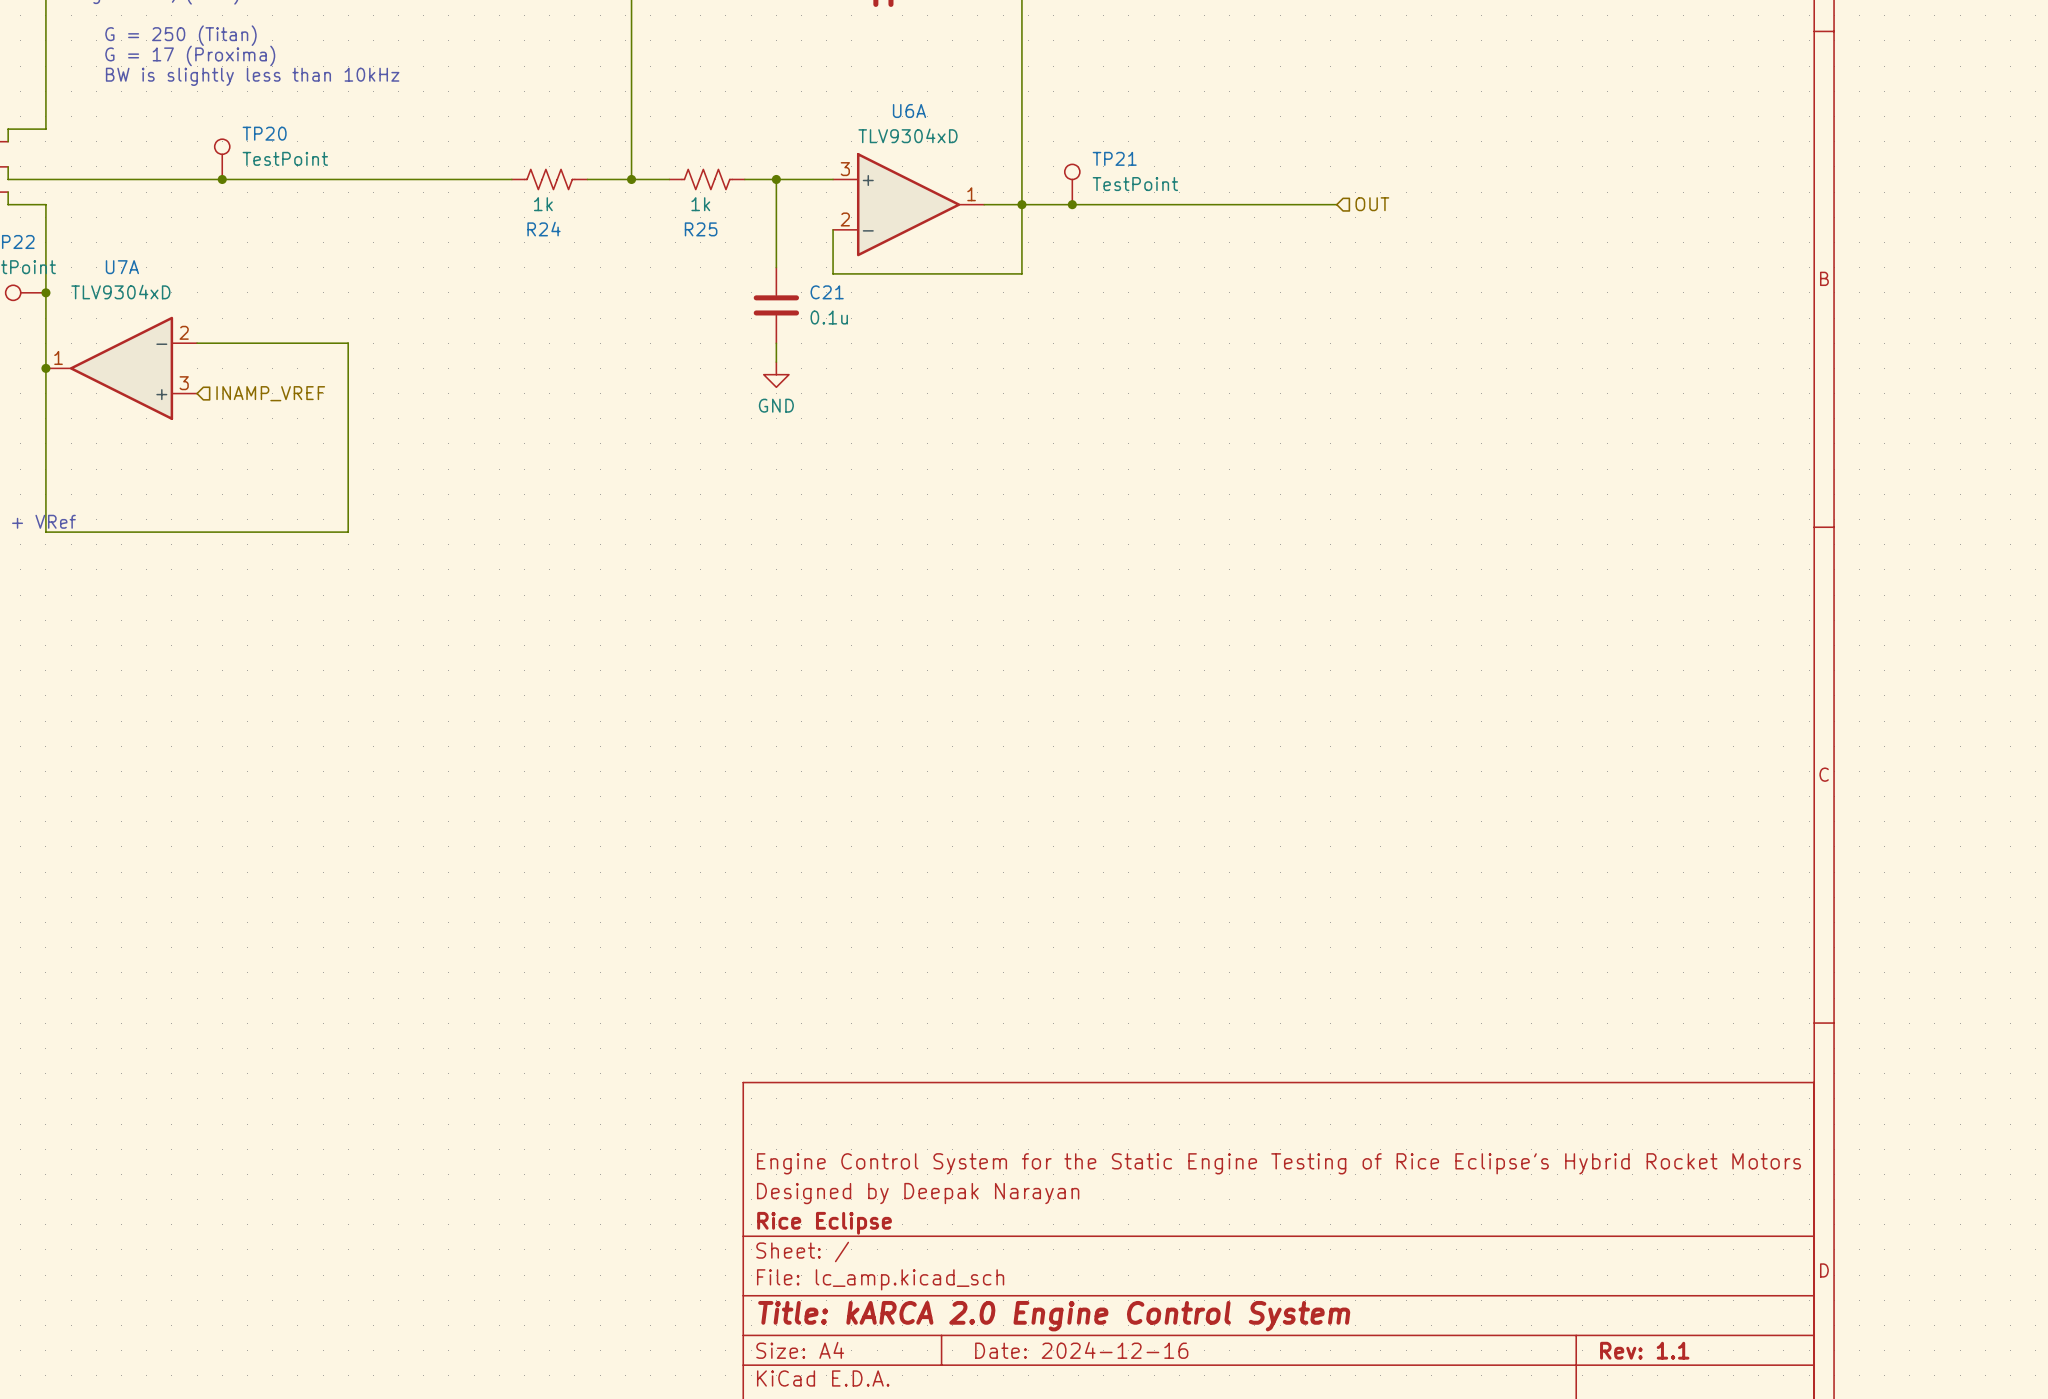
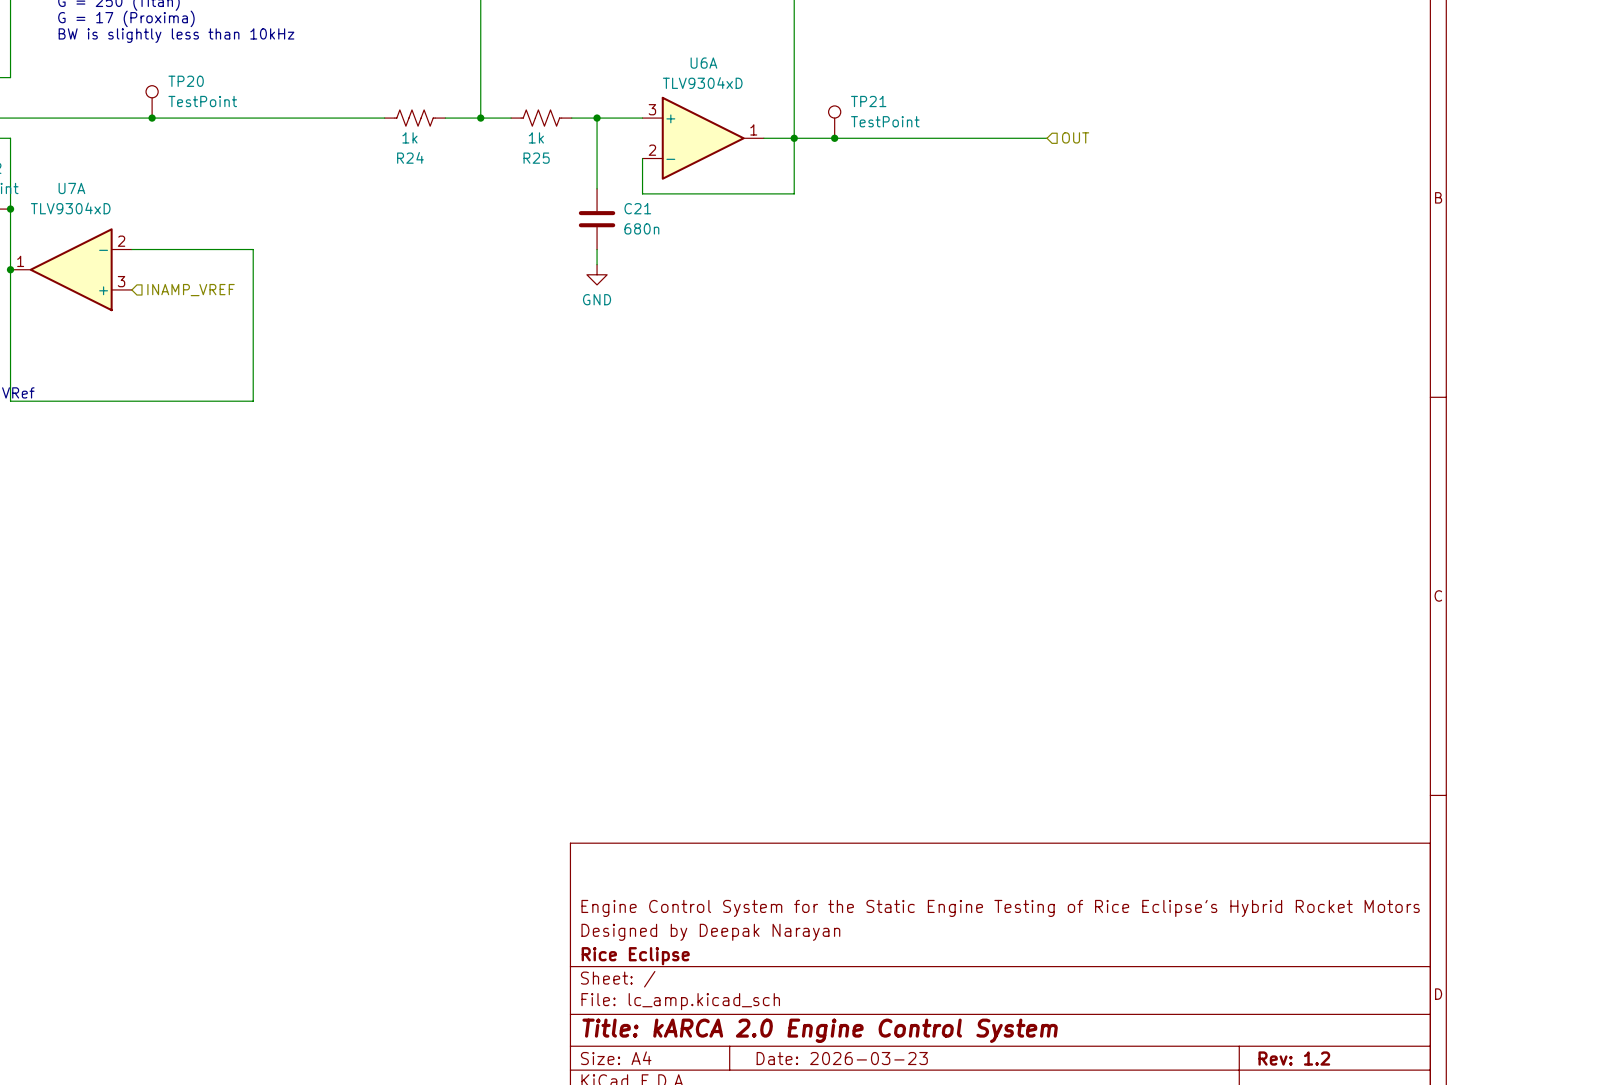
C21 value: 0.1u (829, 317) -> 680n (641, 228)
title block: Date: 2024-12-16 (1081, 1350) -> Date: 2026-03-23 (842, 1058)
title block: Rev: 1.1 (1644, 1350) -> Rev: 1.2 (1294, 1058)

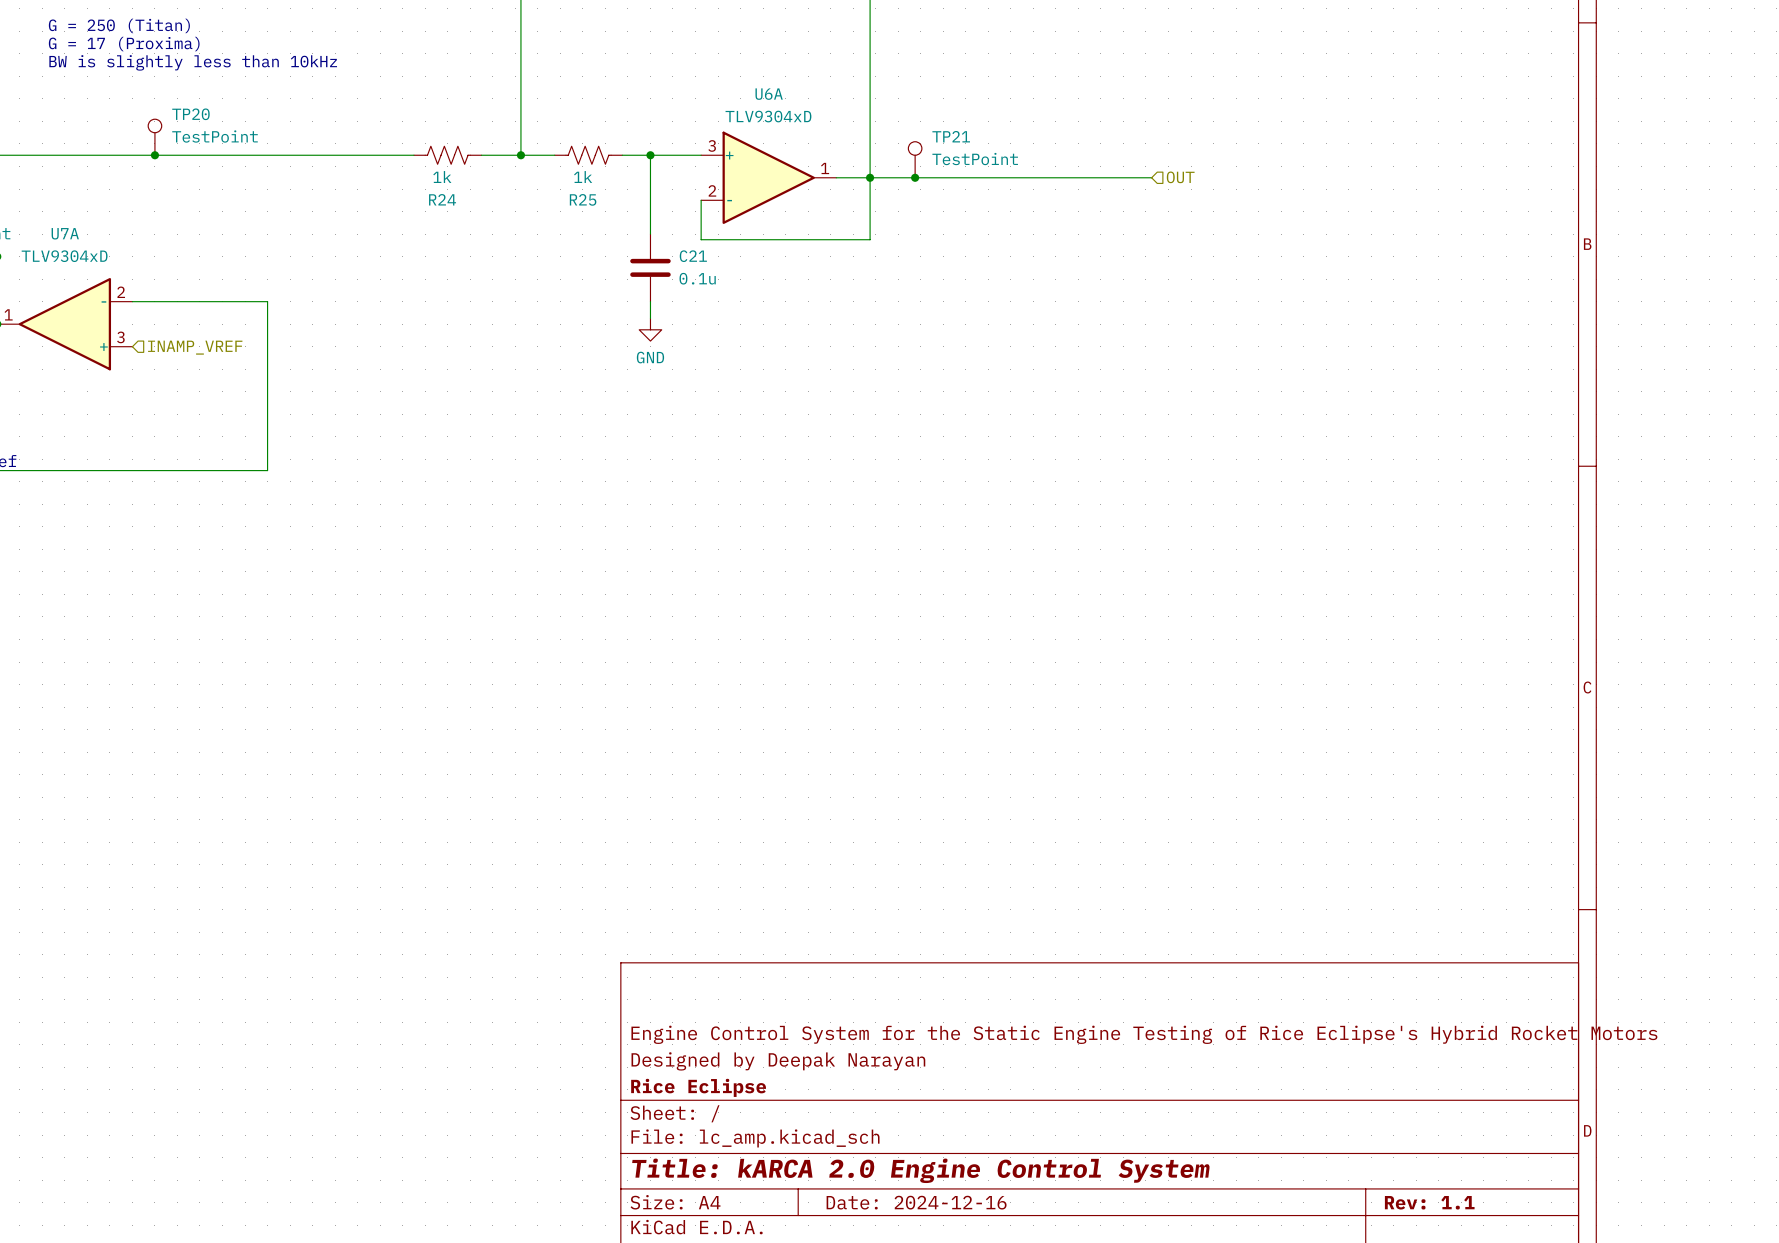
C21 value: 680n (641, 228) -> 0.1u (697, 278)
title block: Date: 2026-03-23 (842, 1058) -> Date: 2024-12-16 (916, 1202)
title block: Rev: 1.2 (1294, 1058) -> Rev: 1.1 (1429, 1202)

